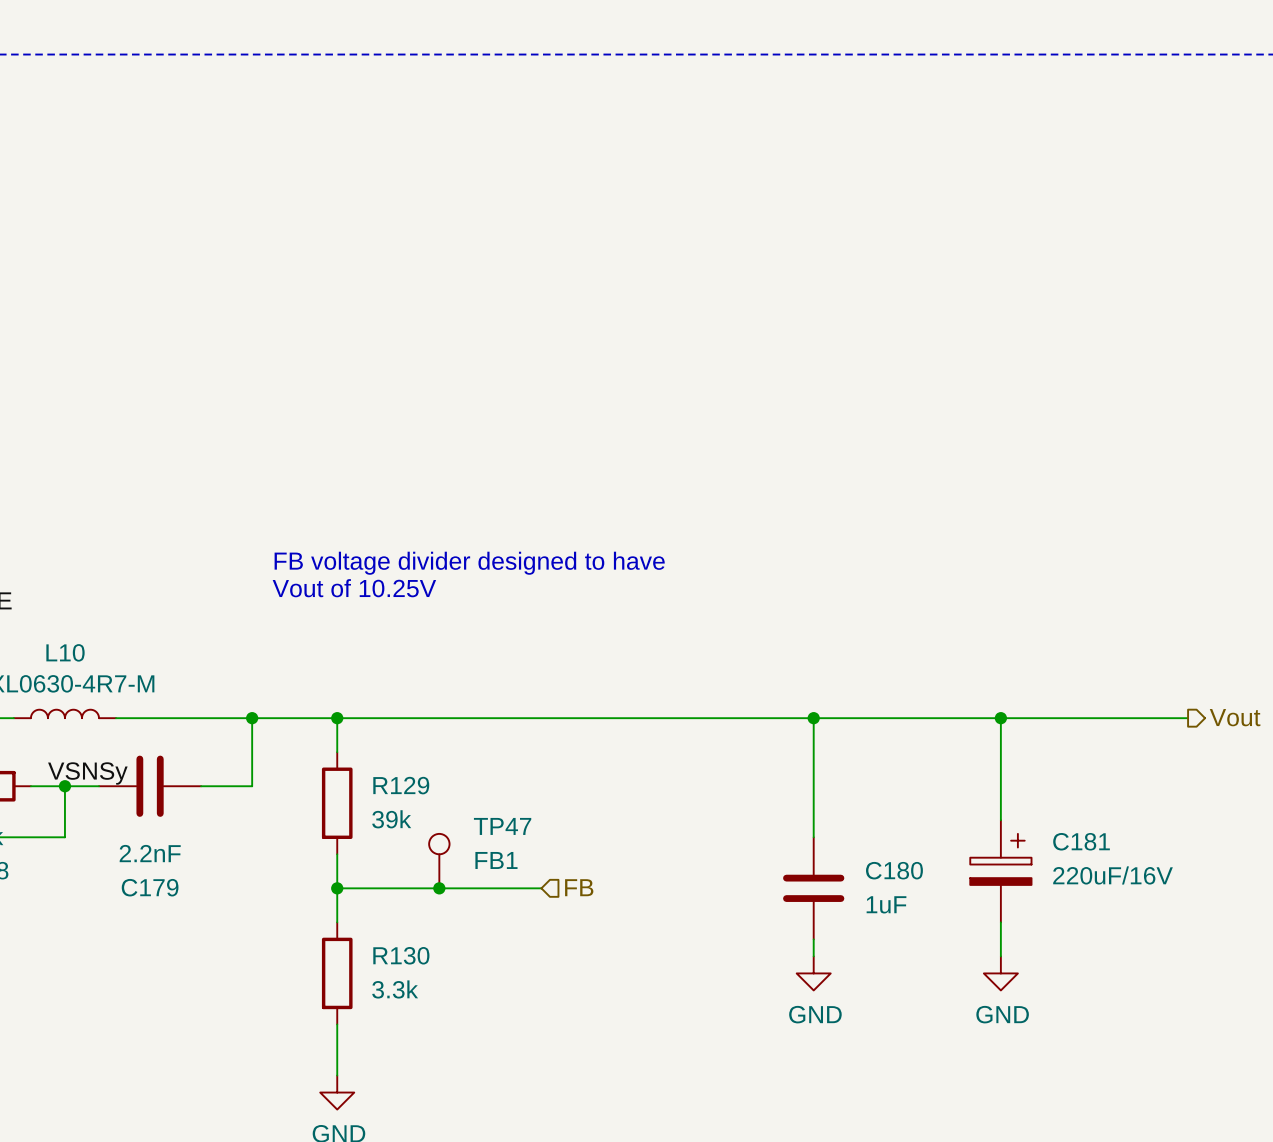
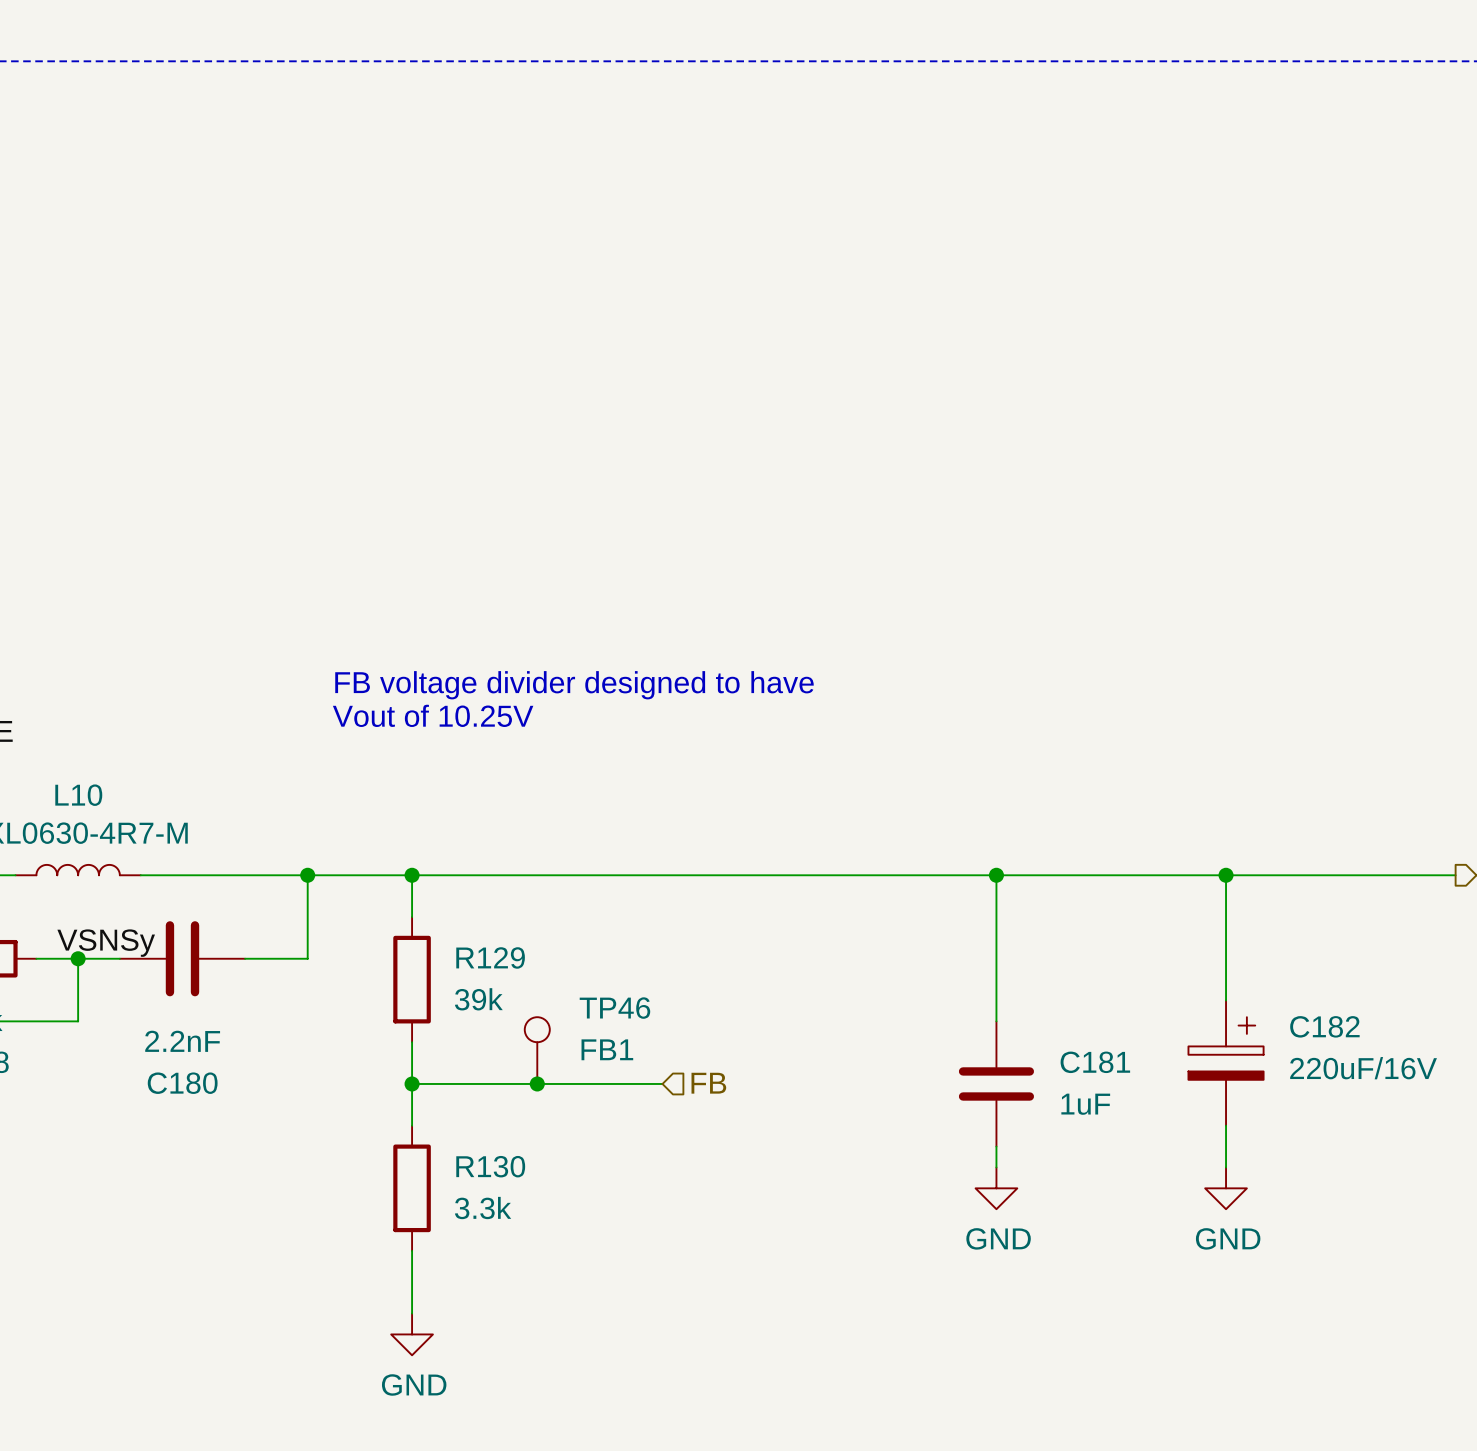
TP47 name: TP47 (502, 826) -> TP46 (614, 1008)
C181 name: C181 (1081, 841) -> C182 (1324, 1026)
C180 name: C180 (894, 870) -> C181 (1095, 1062)
C179 name: C179 (150, 887) -> C180 (182, 1083)

